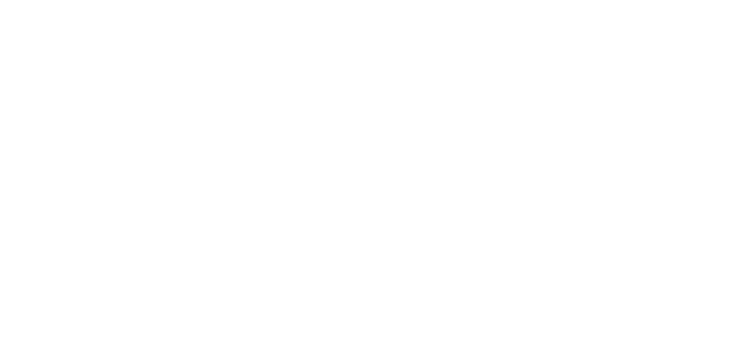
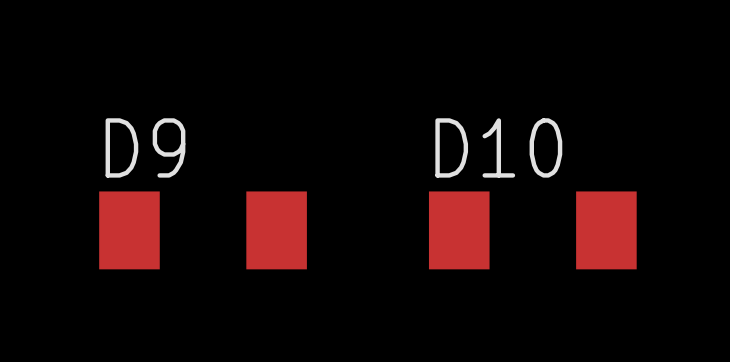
D9: none -> (203, 230)
D10: none -> (532, 230)

